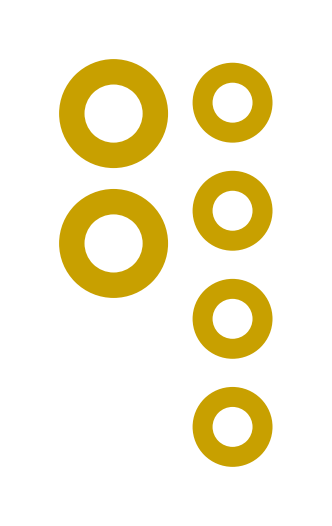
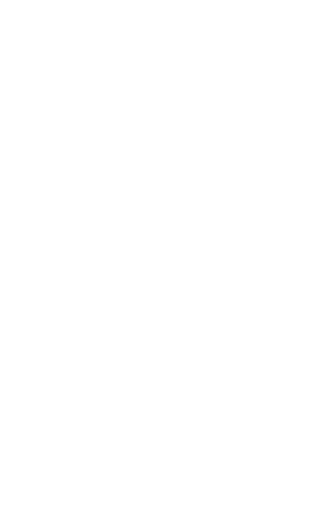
part: (232, 102) -> none
part: (113, 113) -> none
part: (232, 210) -> none
part: (113, 243) -> none
part: (232, 318) -> none
part: (232, 426) -> none

